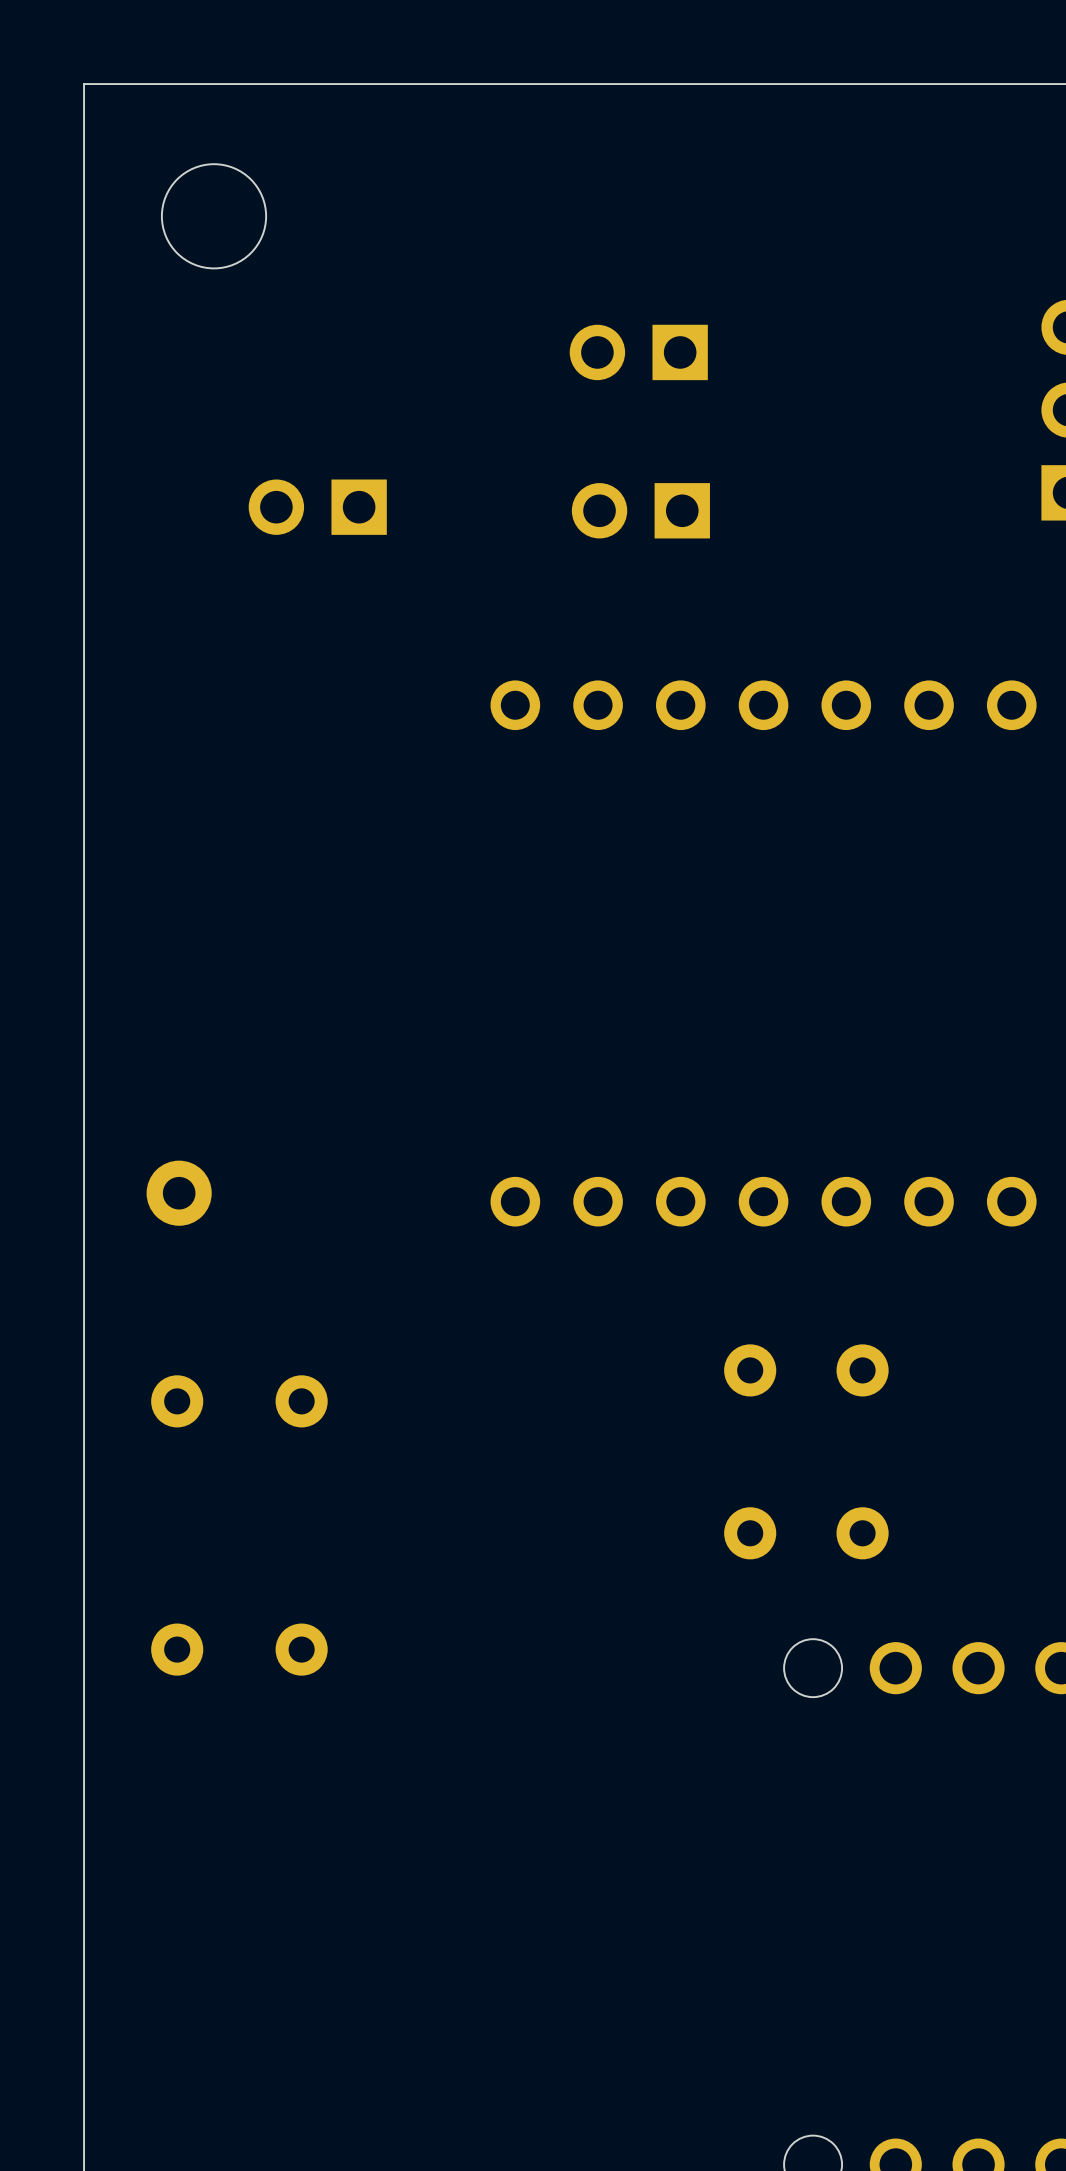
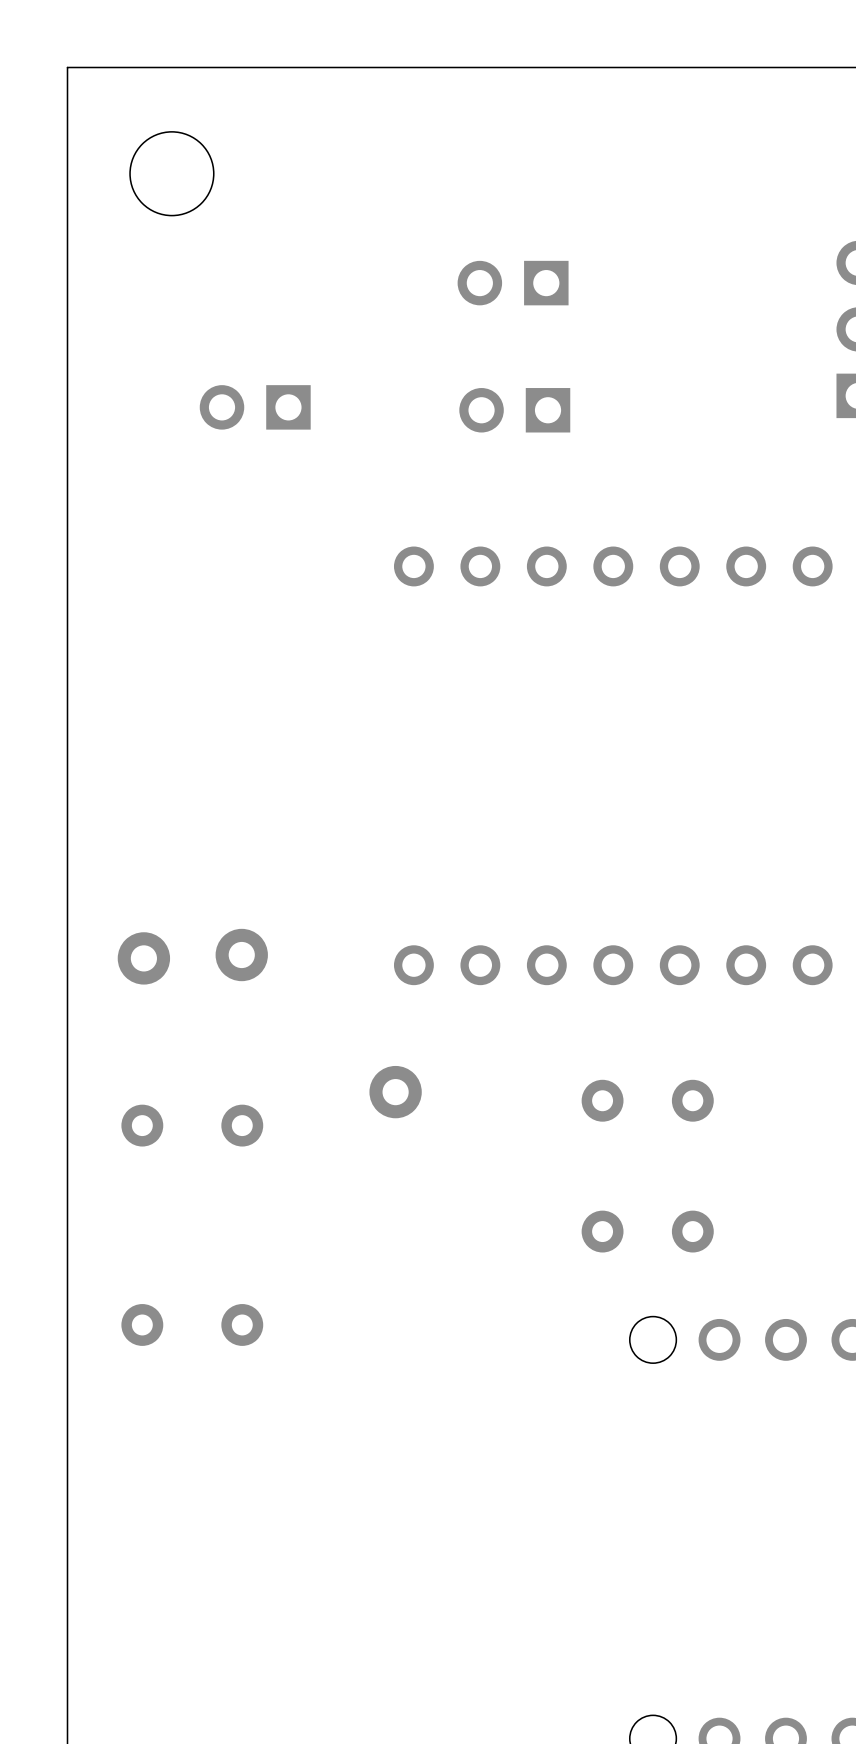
part: none -> (241, 955)
part: none -> (395, 1092)

